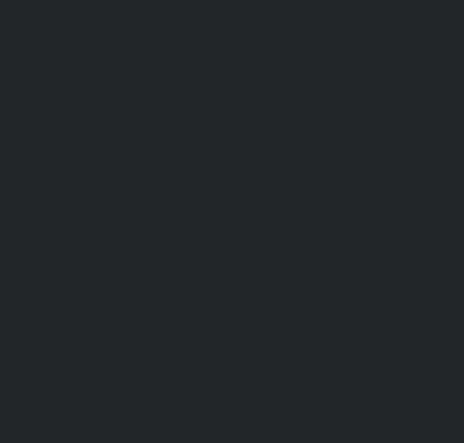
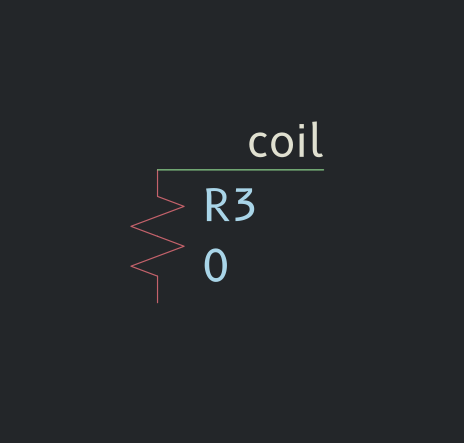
label: none -> coil (286, 139)
wire: none -> (157, 169) (323, 169)
R3: none -> 0 (157, 236)

